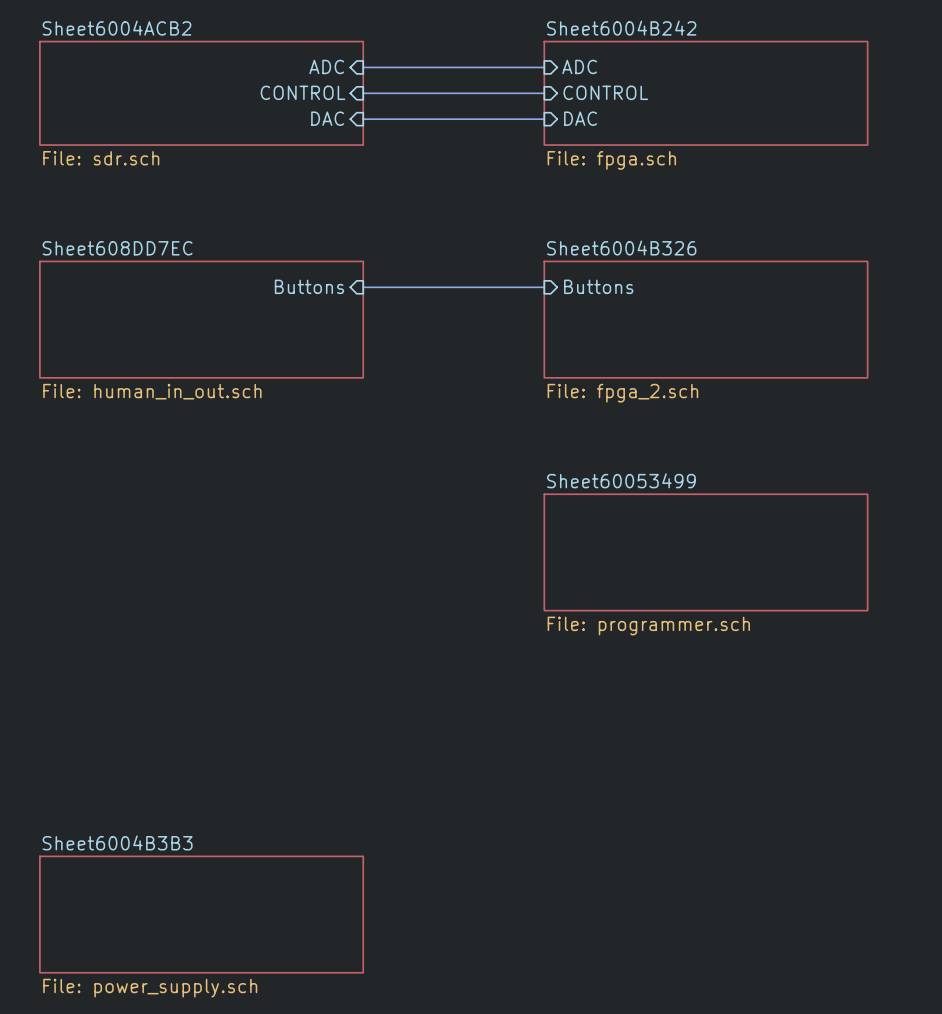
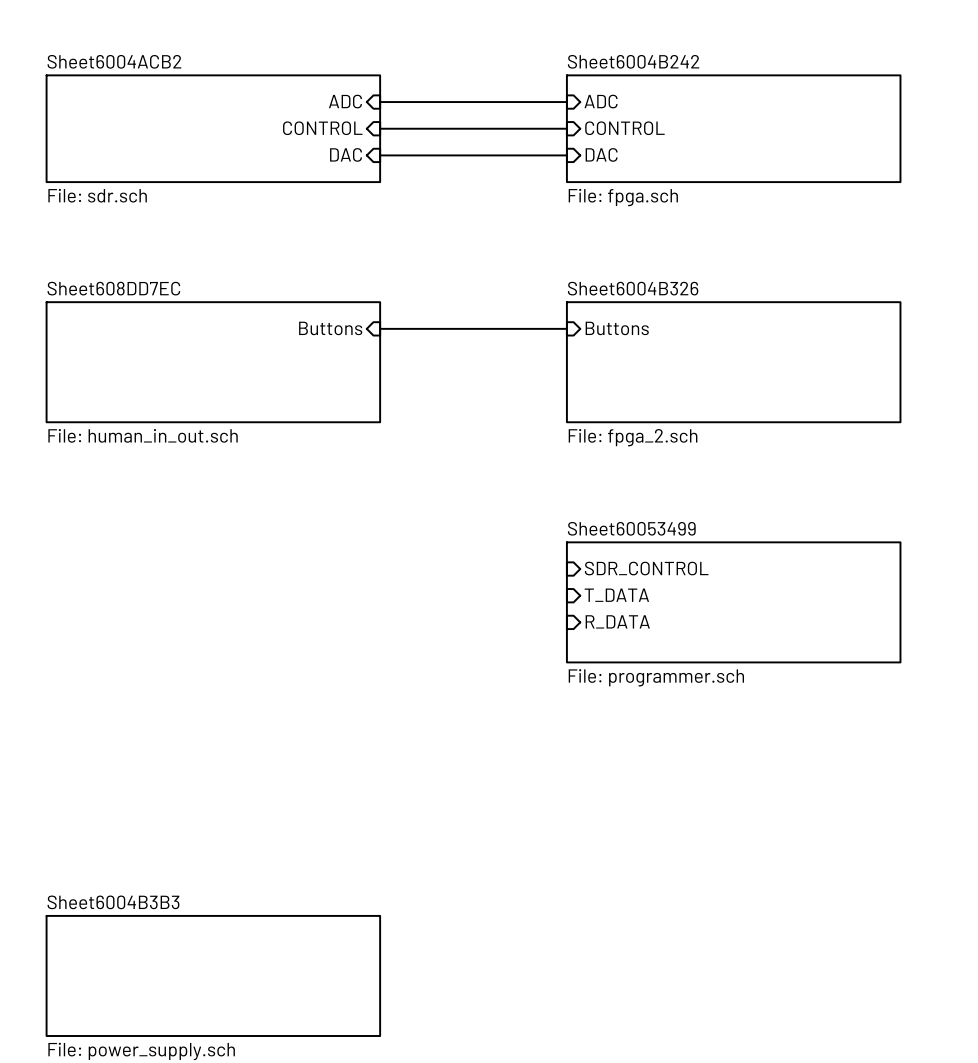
sheet pin: none -> SDR_CONTROL (646, 568)
sheet pin: none -> T_DATA (616, 595)
sheet pin: none -> R_DATA (617, 621)

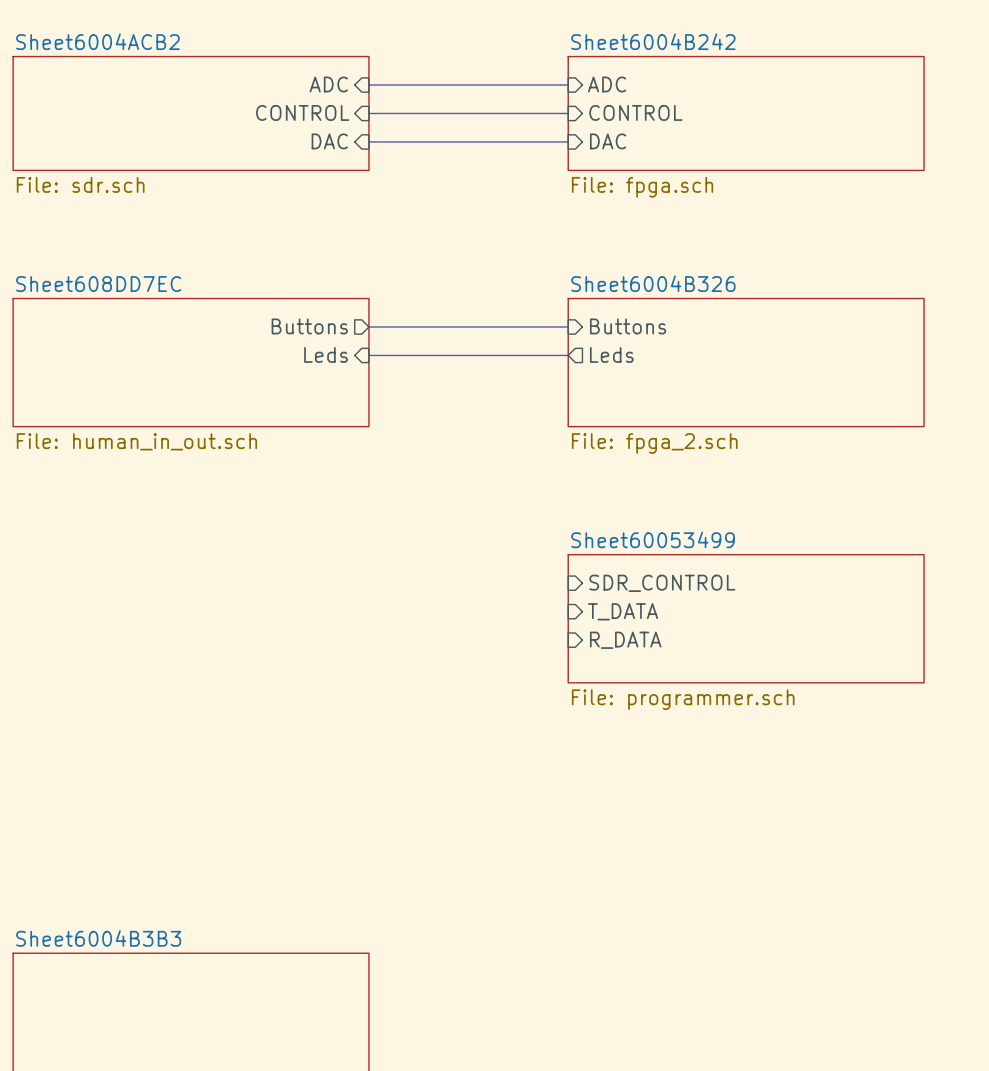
sheet pin shape: input (330, 328) -> output (309, 326)
sheet pin: none -> Leds (326, 354)
bus: none -> (368, 355) (568, 355)
sheet pin: none -> Leds (611, 354)

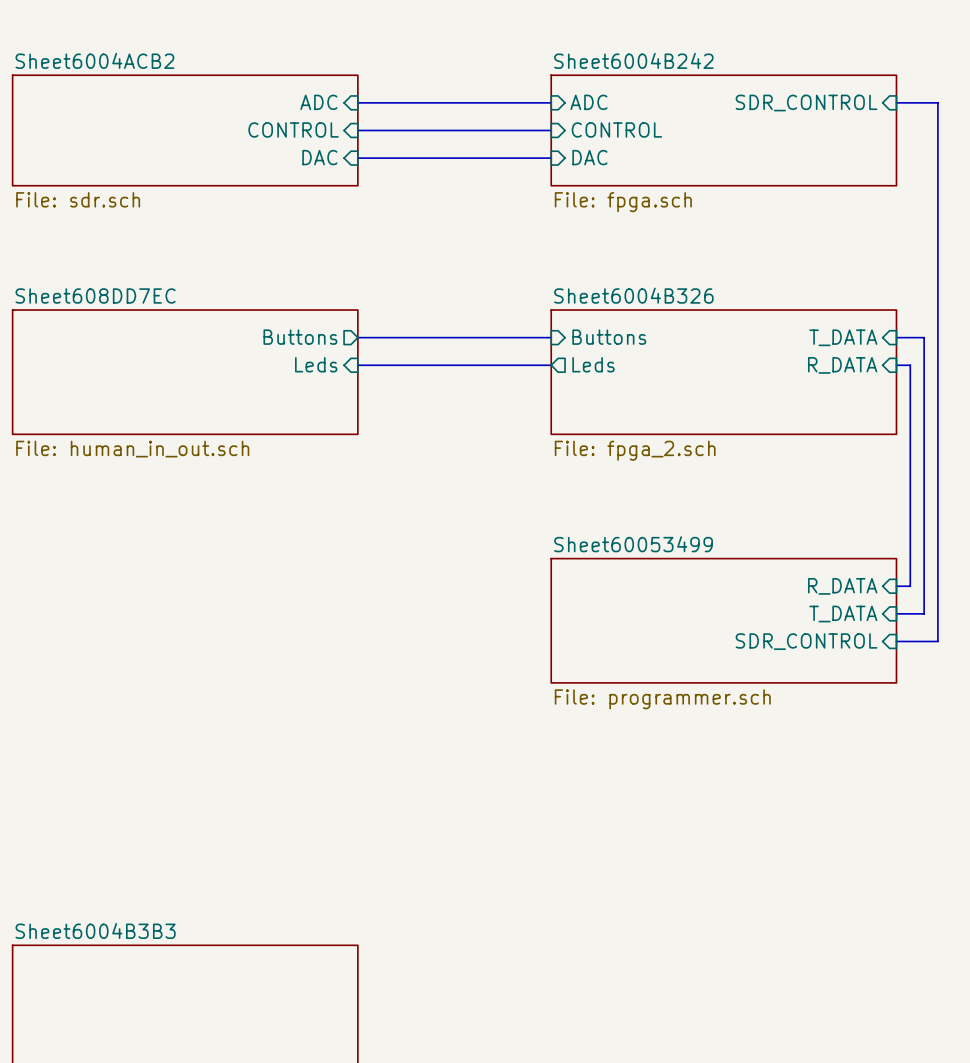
sheet pin: none -> SDR_CONTROL (806, 103)
bus: none -> (896, 102) (937, 102) (937, 641) (896, 641)
bus: none -> (896, 337) (924, 337) (924, 613) (896, 613)
sheet pin: none -> T_DATA (843, 337)
sheet pin: none -> R_DATA (842, 365)
bus: none -> (896, 365) (910, 365) (910, 586) (896, 586)
sheet pin: SDR_CONTROL (662, 583) -> none
sheet pin: none -> R_DATA (842, 586)
sheet pin: T_DATA (623, 611) -> none
sheet pin: none -> T_DATA (843, 614)
sheet pin: R_DATA (625, 640) -> none
sheet pin: none -> SDR_CONTROL (806, 641)

